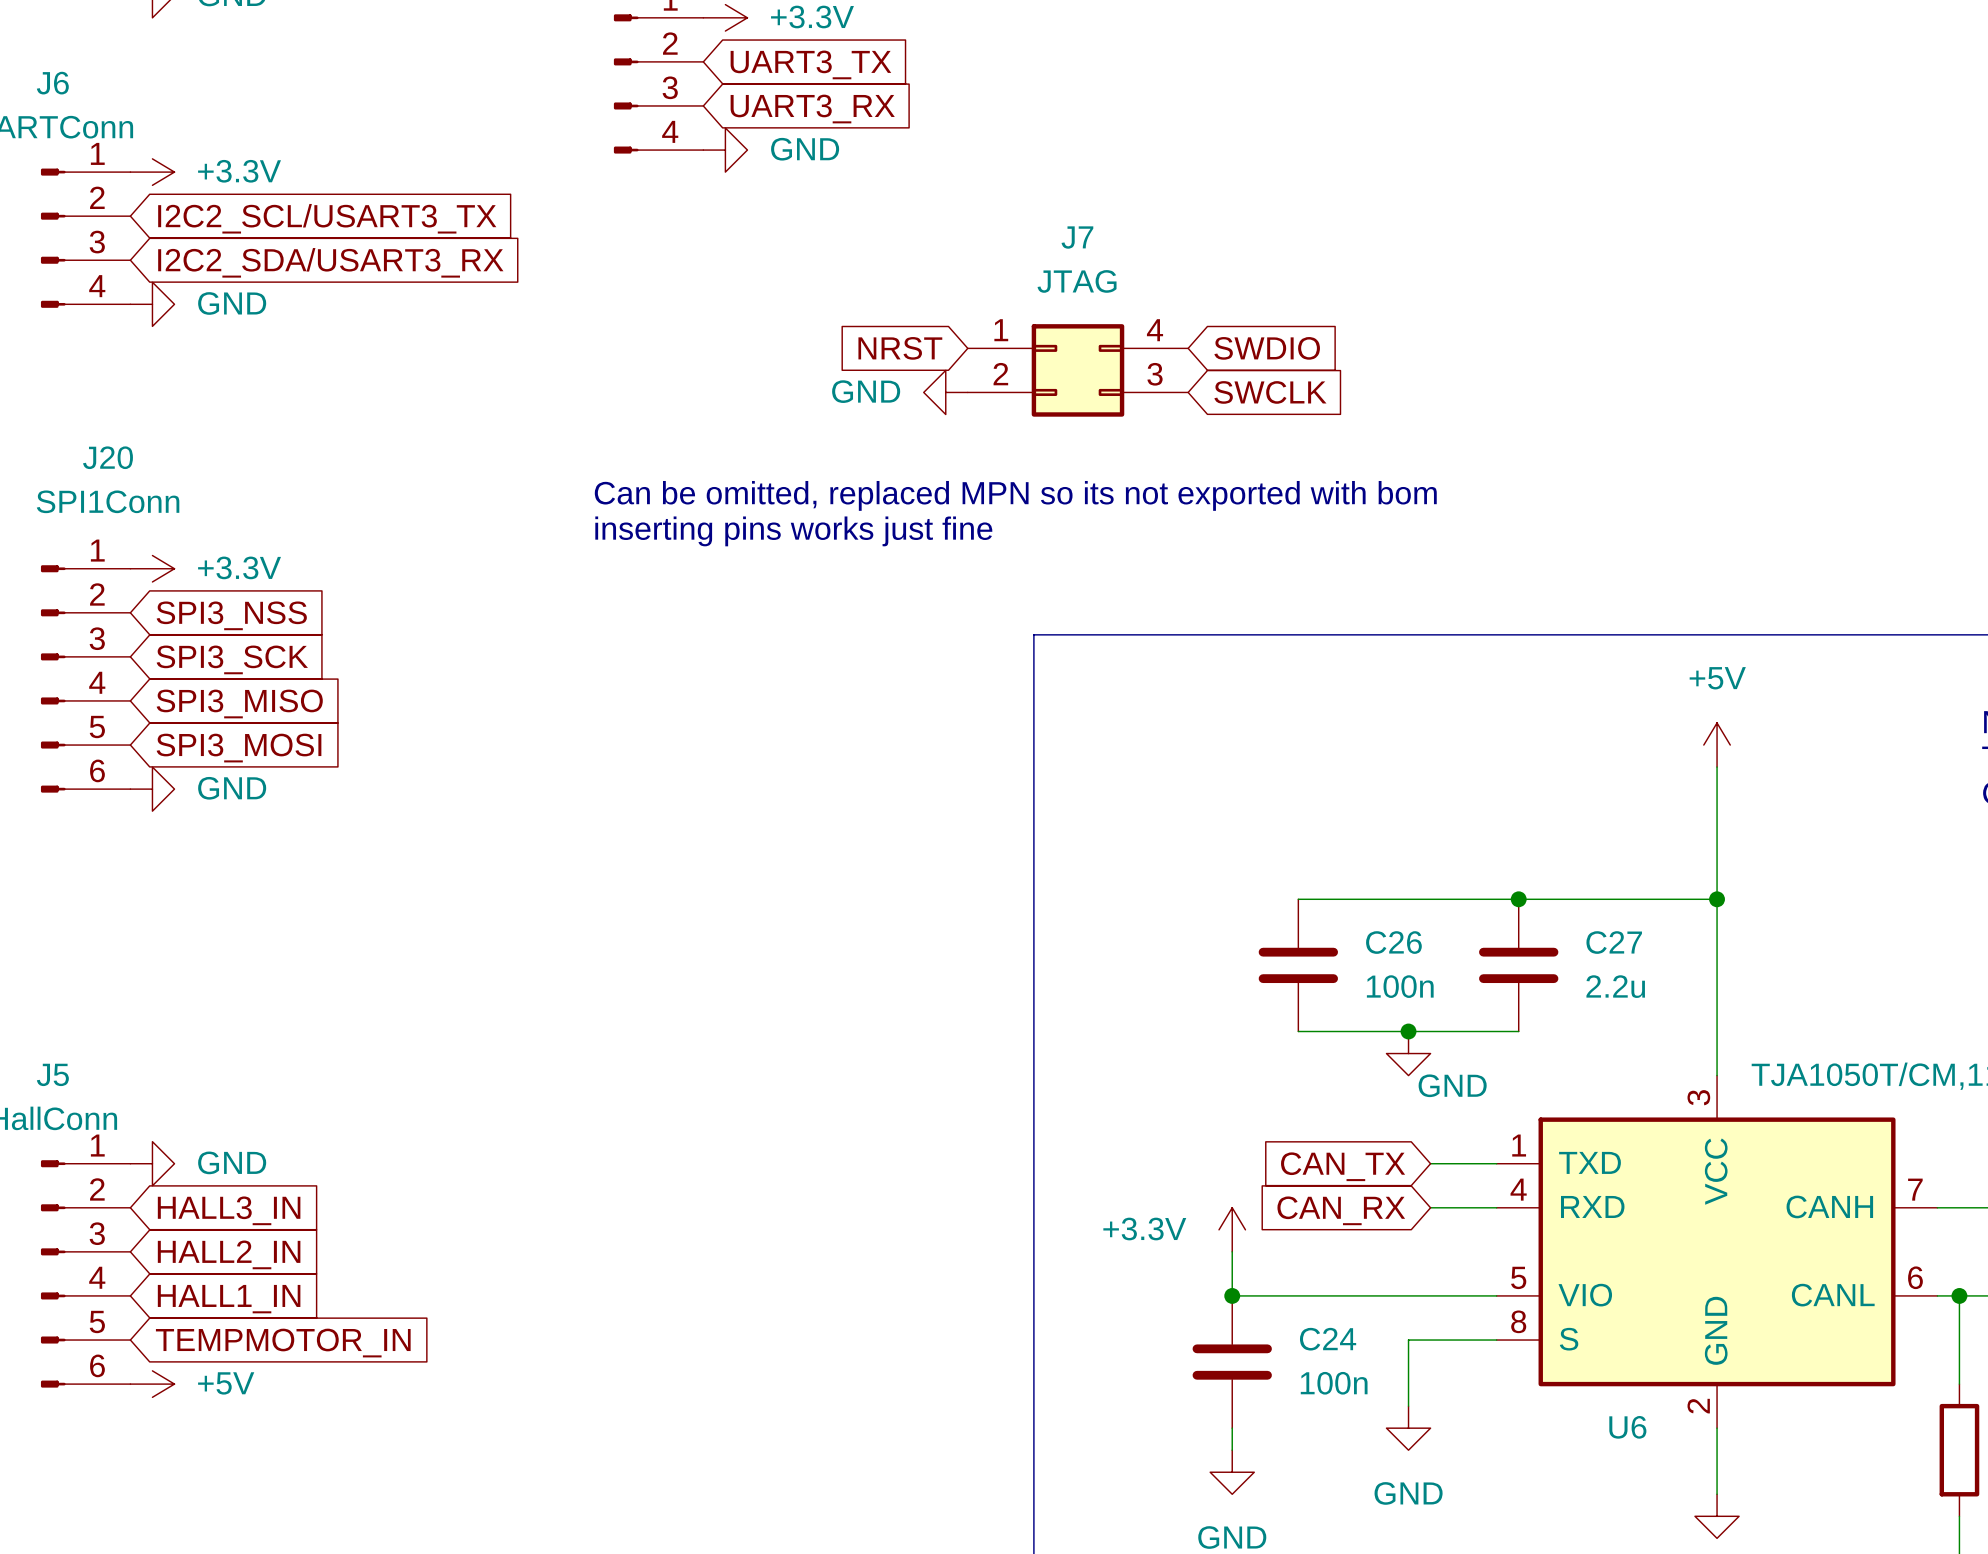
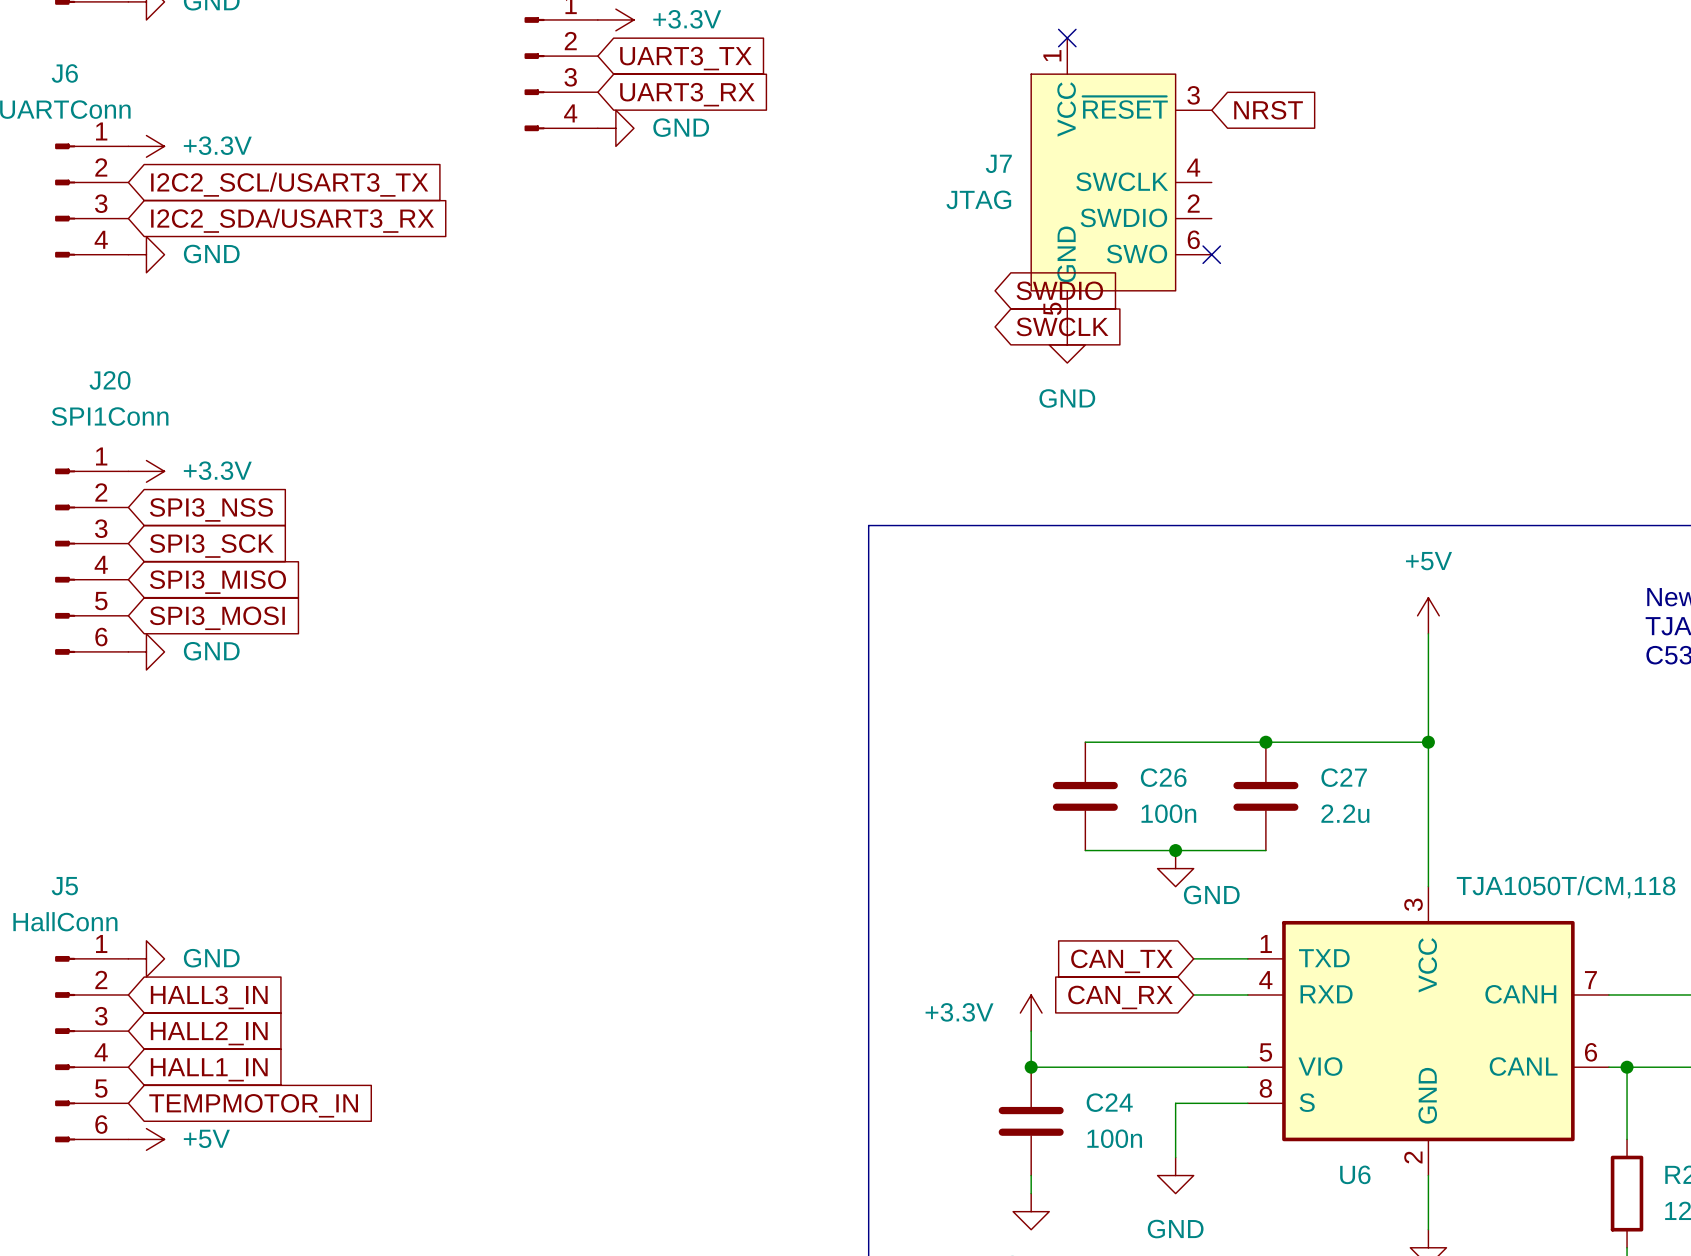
no-connect mark: none -> (1067, 38)
global label: none -> NRST (1268, 110)
J7 name position: J7 (1077, 237) -> J7 (998, 163)
J7 value position: JTAG (1077, 281) -> JTAG (978, 199)
no-connect mark: none -> (1211, 254)
J7 symbol: [967, 324, 1189, 417] -> [1031, 38, 1212, 327]
global label: NRST (900, 348) -> none
power symbol rotation: 0° (945, 392) -> 90° counterclockwise (1067, 344)
power symbol position: GND (945, 392) -> GND (1067, 344)
text: Can be omitted, replaced MPN so its not exported with bom (1015, 495) -> none
text: inserting pins works just fine (793, 531) -> none

